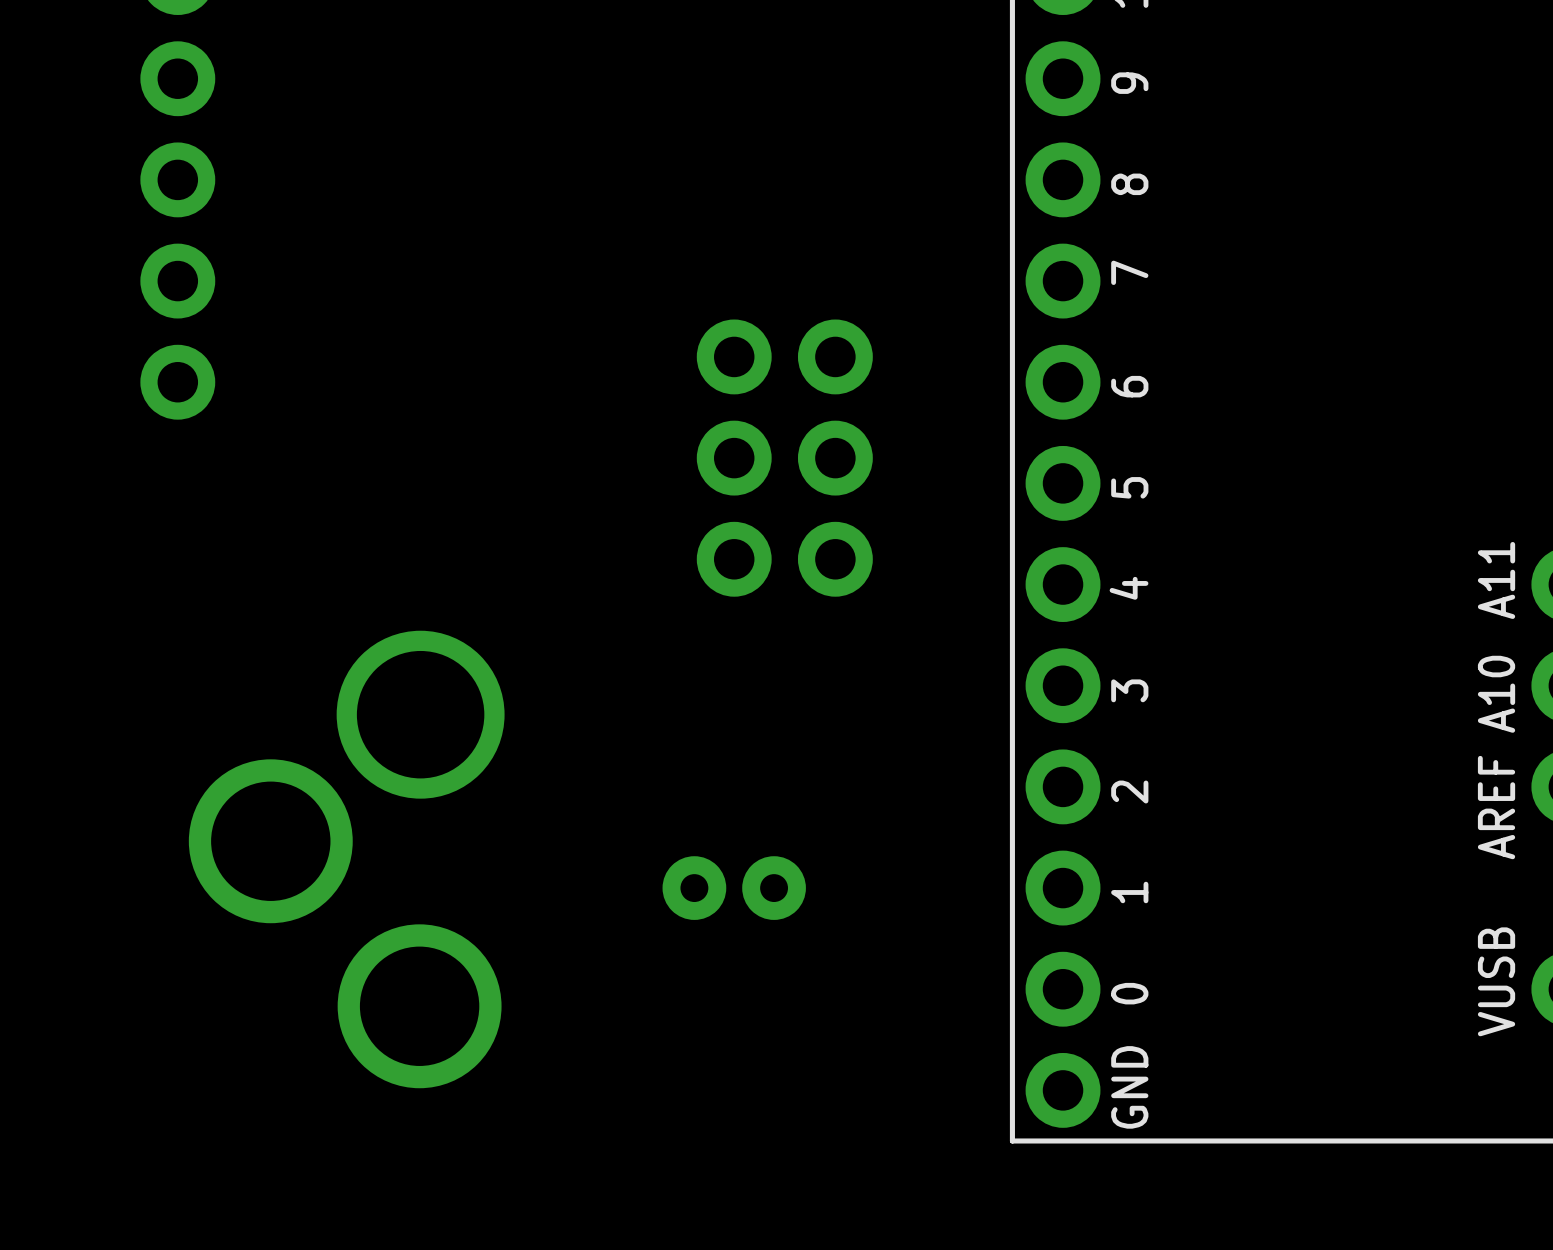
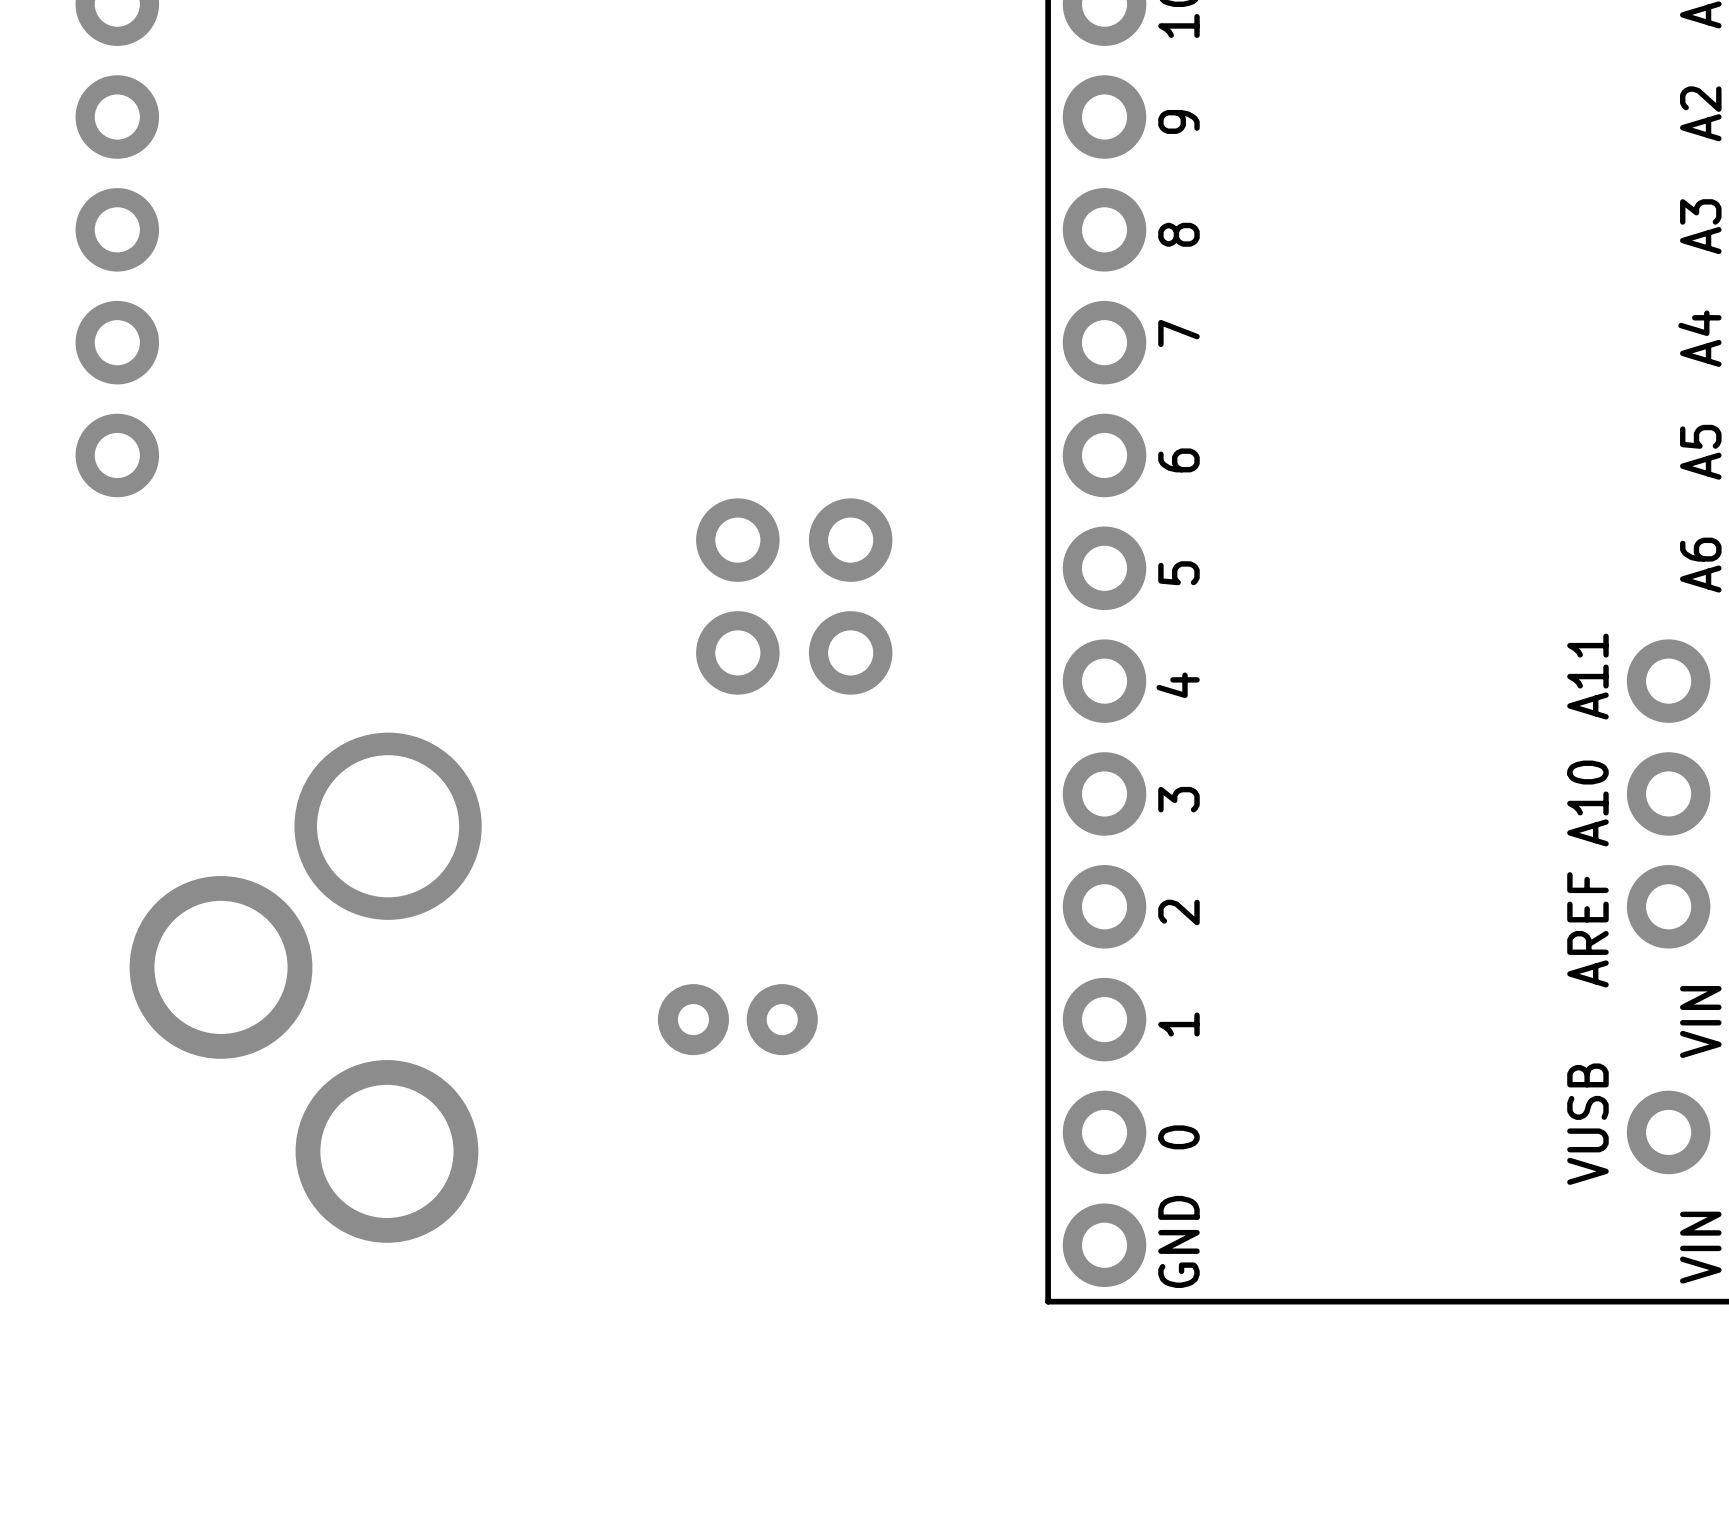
part: (784, 356) -> none

